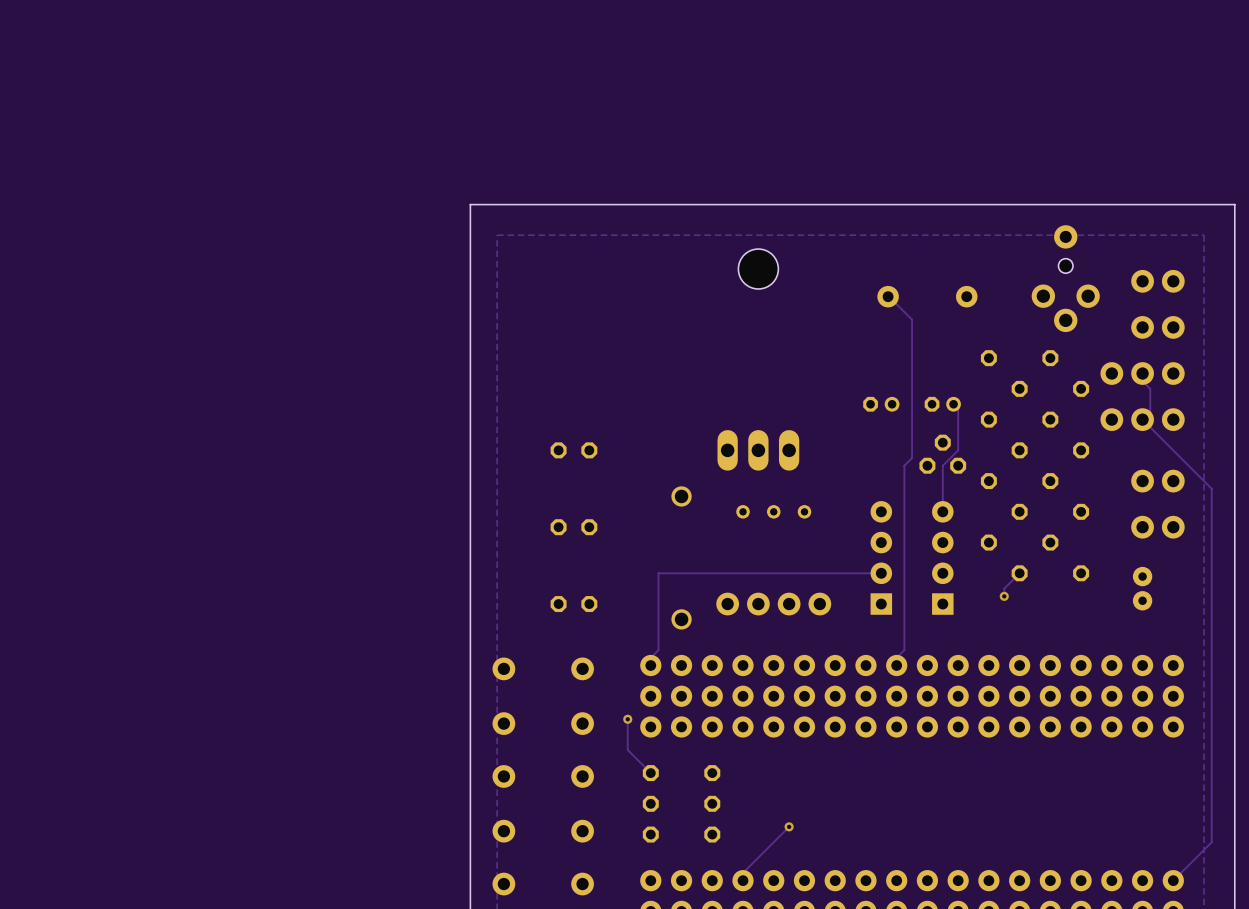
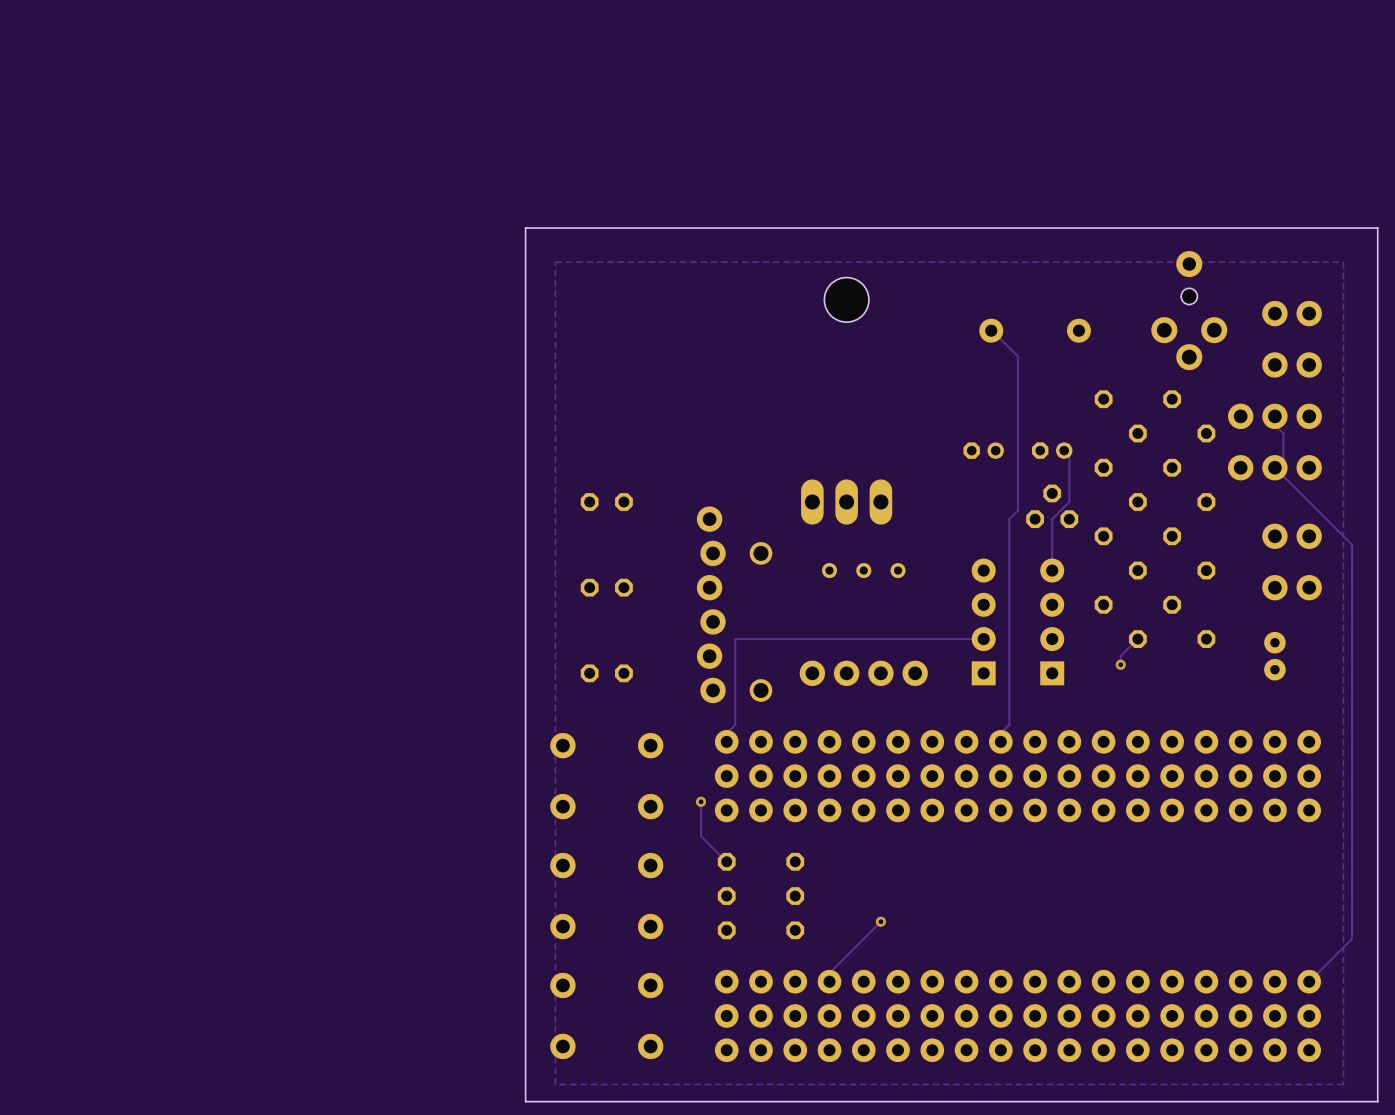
part position: (573, 450) -> (606, 502)
part position: (573, 527) -> (606, 587)
part: none -> (711, 604)
part position: (573, 604) -> (606, 673)

